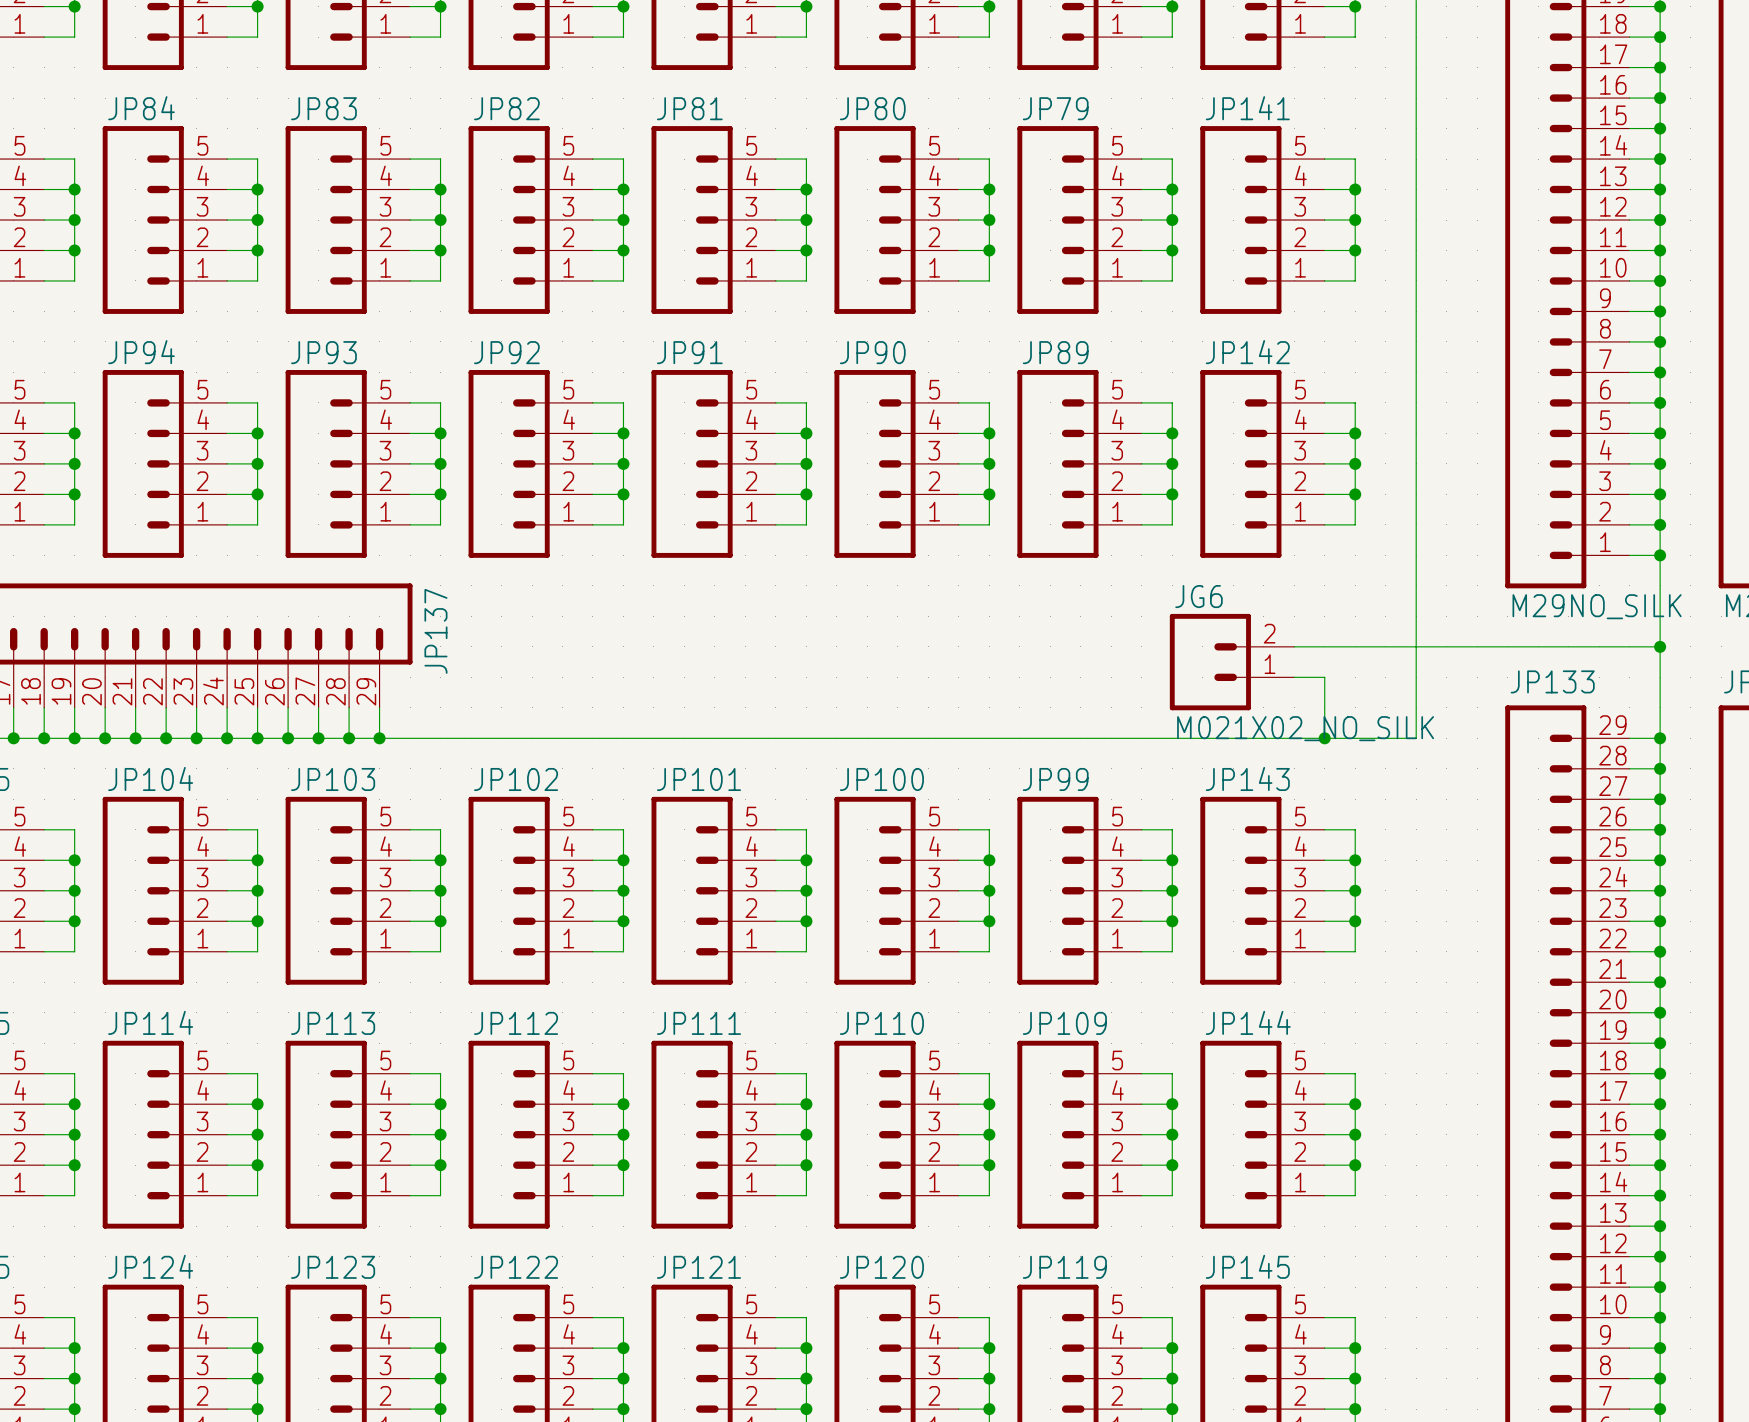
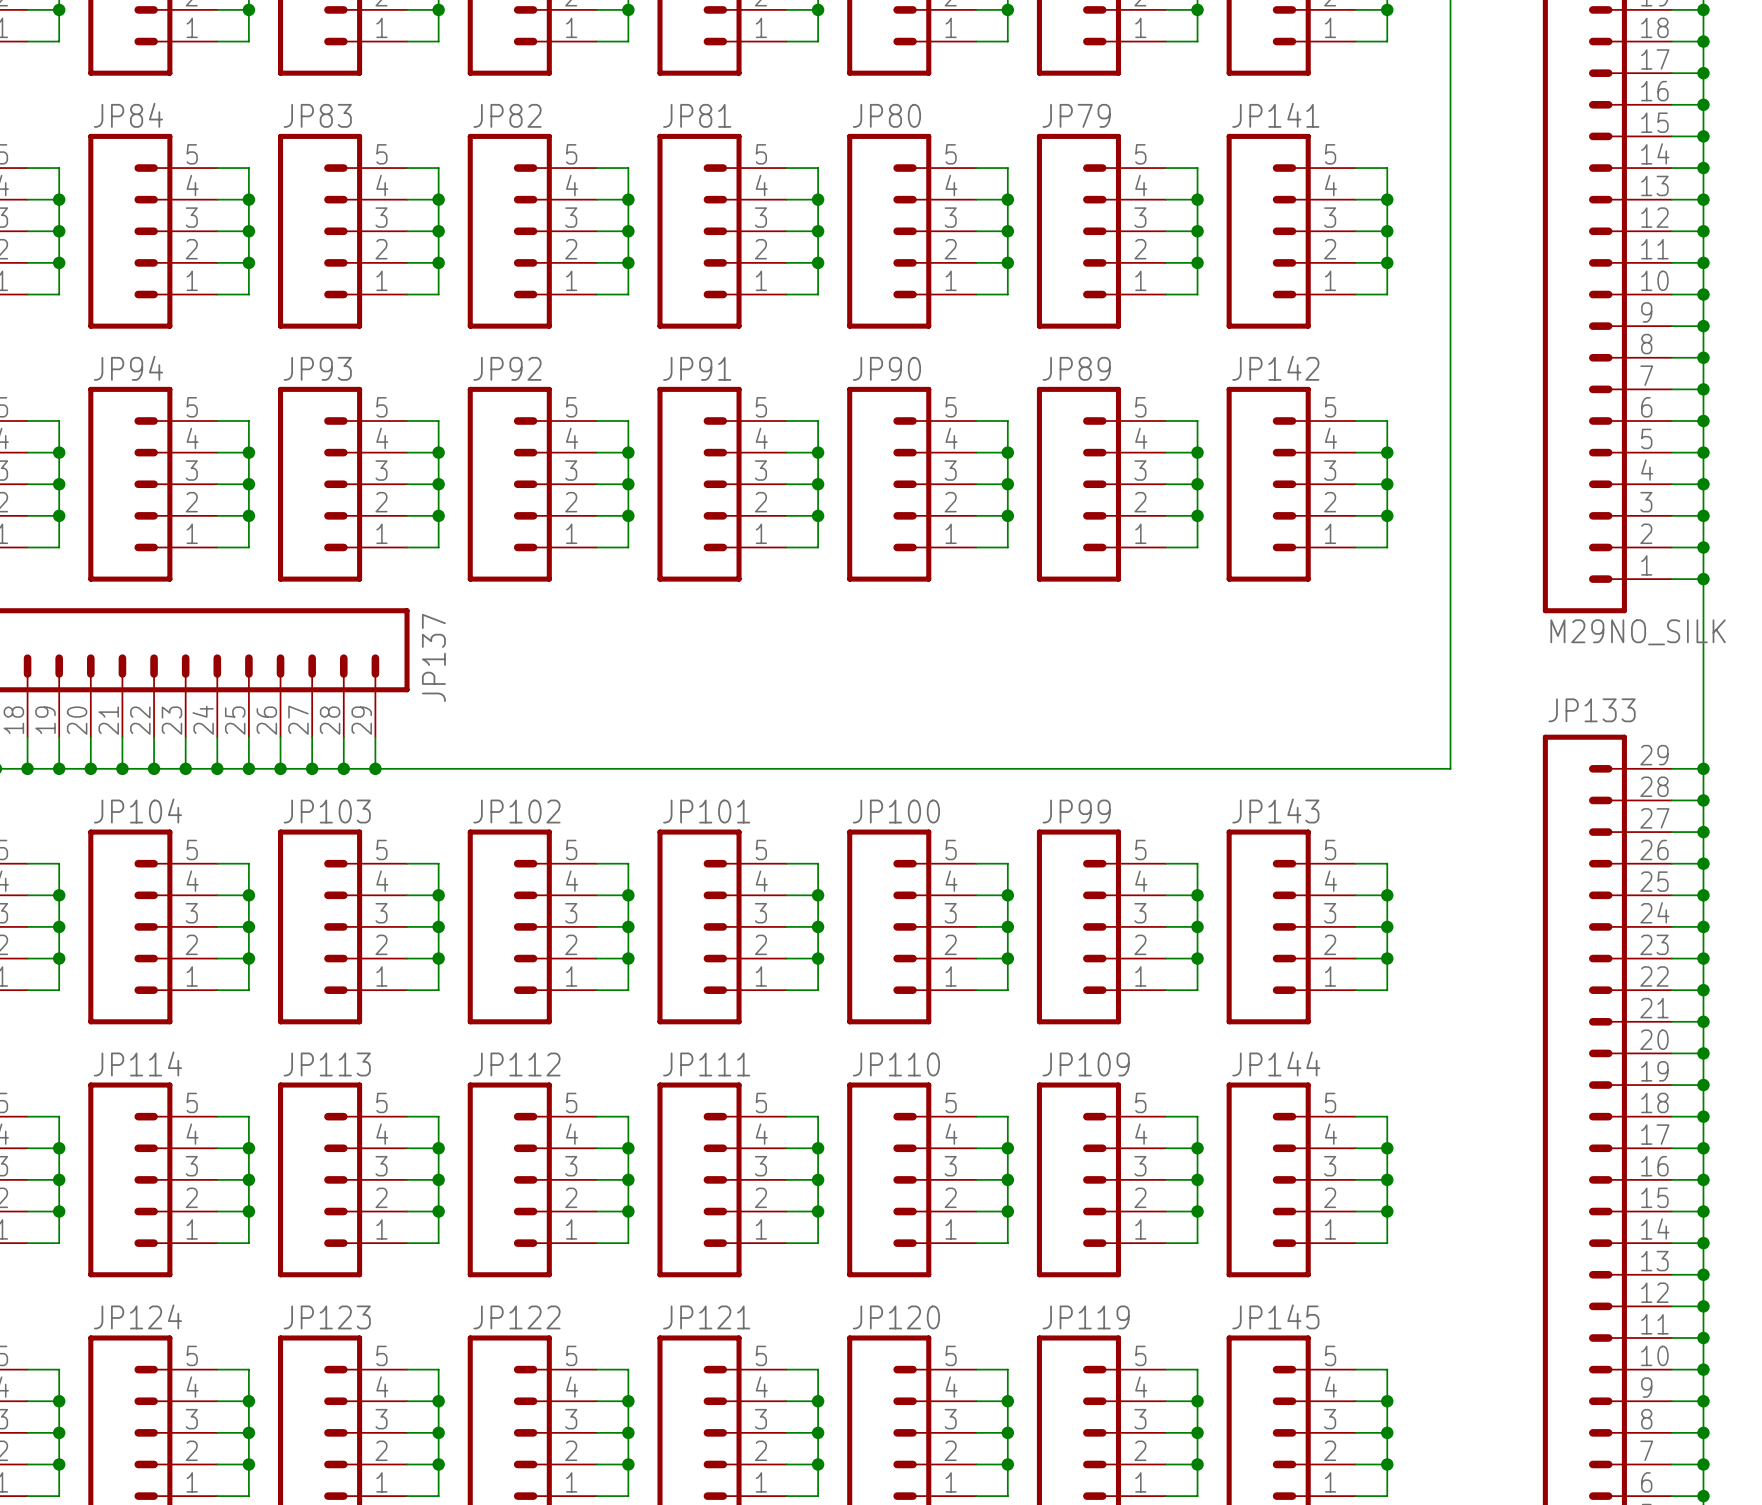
wire: (1294, 646) (1660, 646) -> none
junction: (1660, 646) -> none
JG6: M021X02_NO_SILK (1232, 662) -> none
wire: (1294, 677) (1324, 677) (1324, 738) -> none
junction: (1324, 738) -> none

